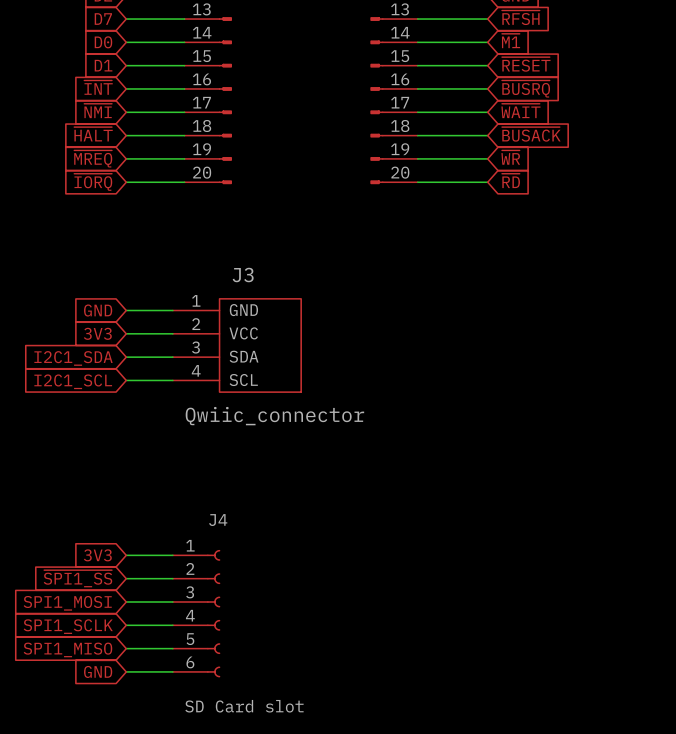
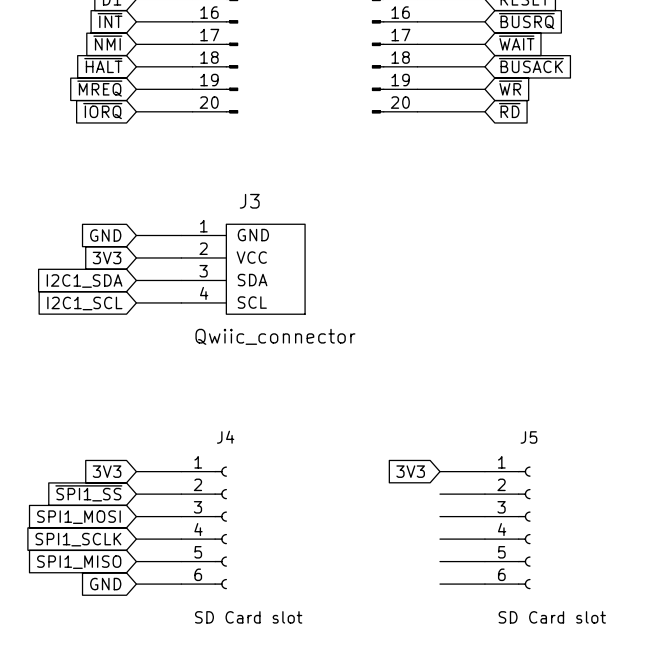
global label: none -> 3V3 (410, 471)
wire: none -> (439, 471) (484, 471)
wire: none -> (439, 494) (484, 494)
wire: none -> (439, 516) (484, 516)
J5: none -> SD Card slot (507, 527)
wire: none -> (439, 539) (484, 539)
wire: none -> (439, 561) (484, 561)
wire: none -> (439, 584) (484, 584)

